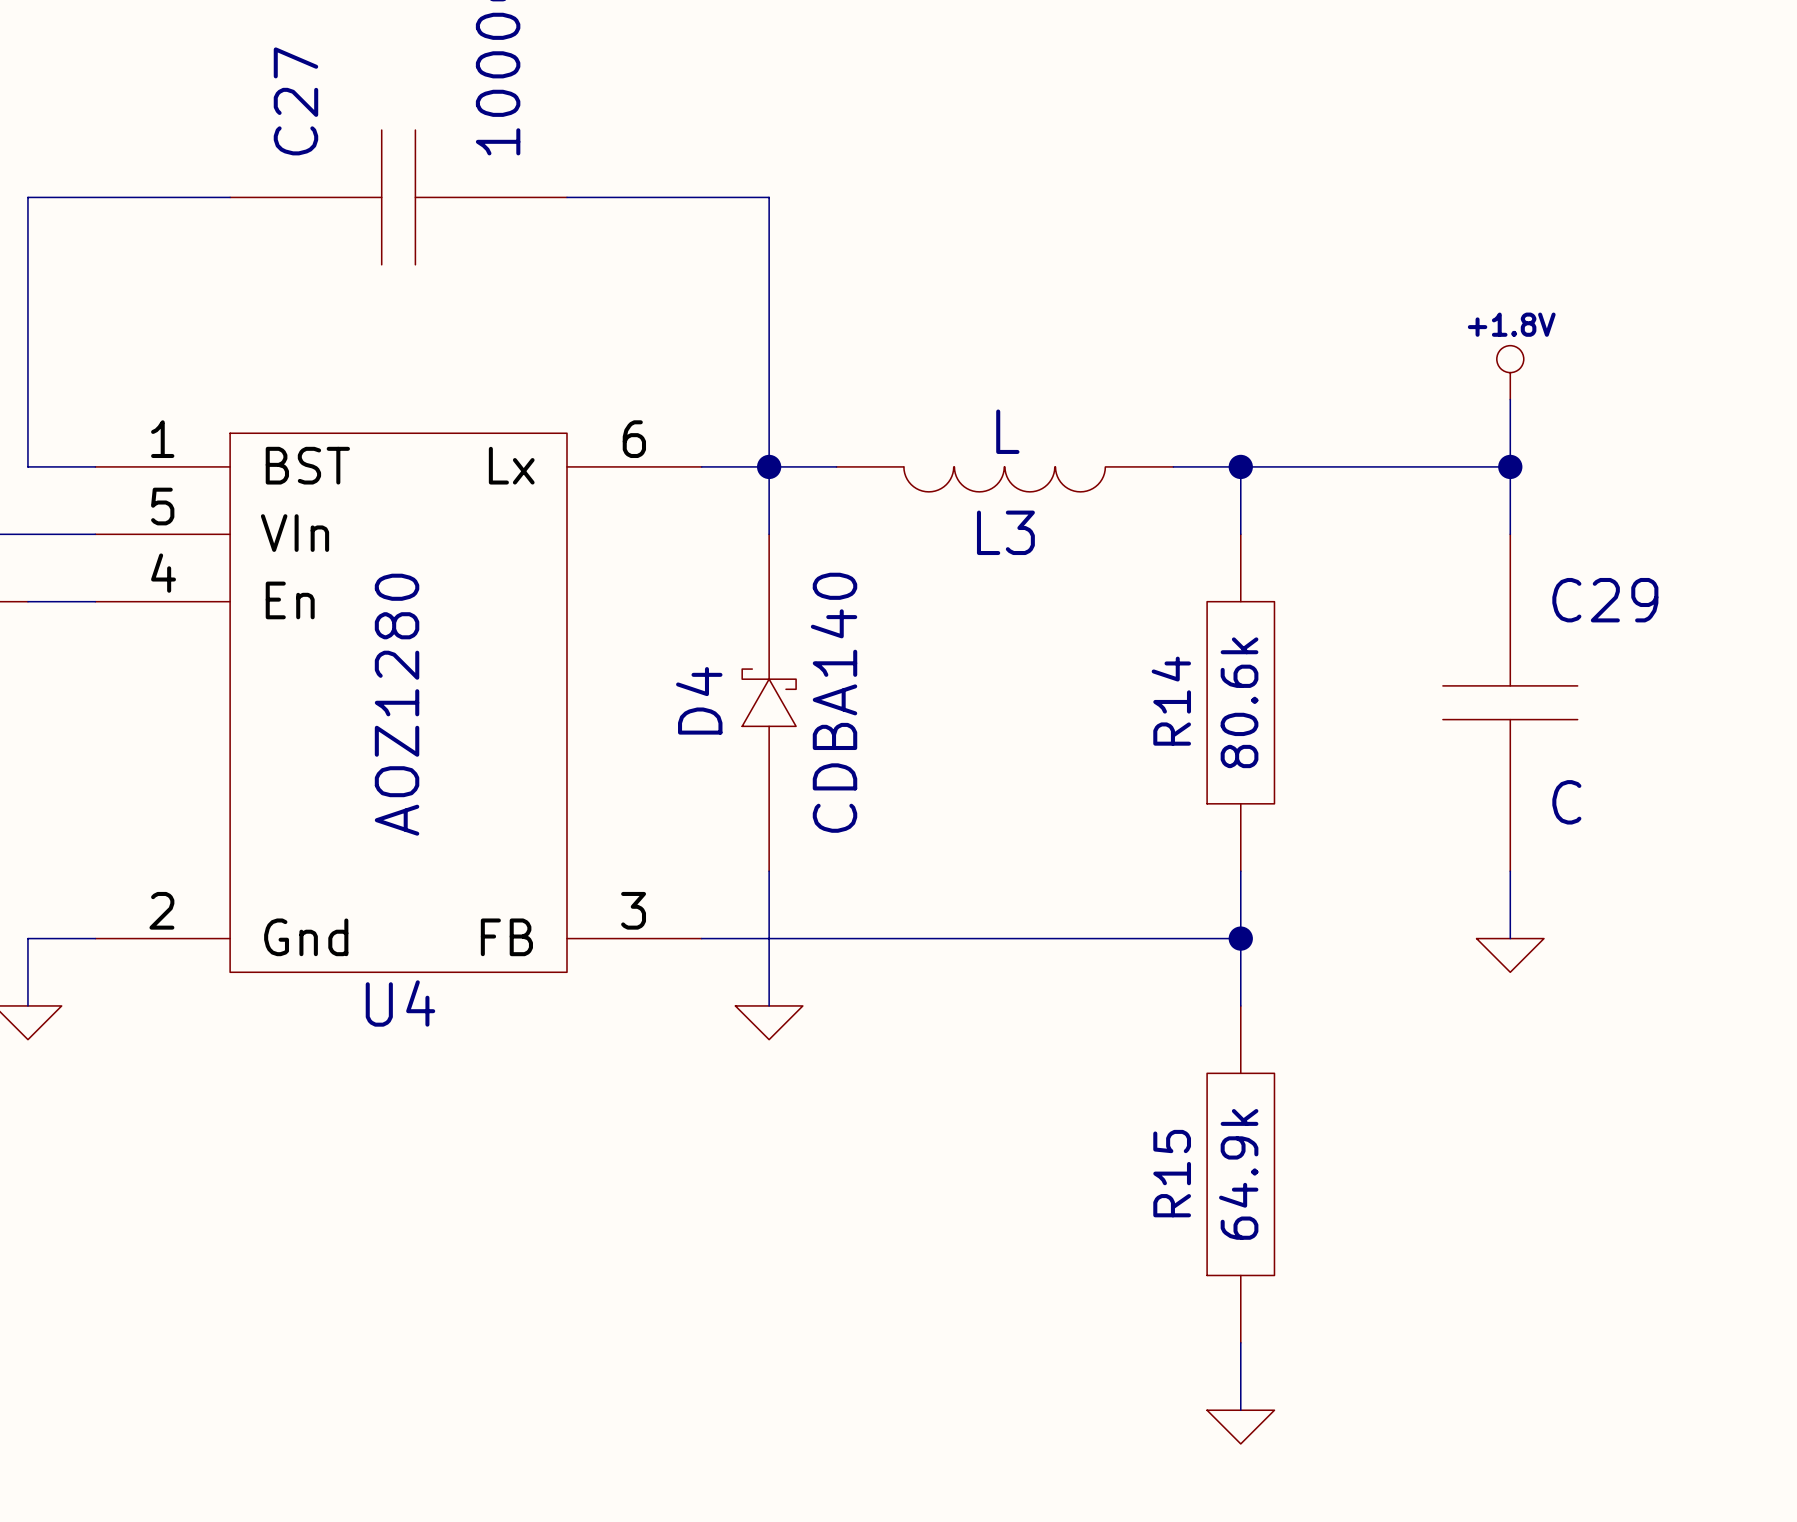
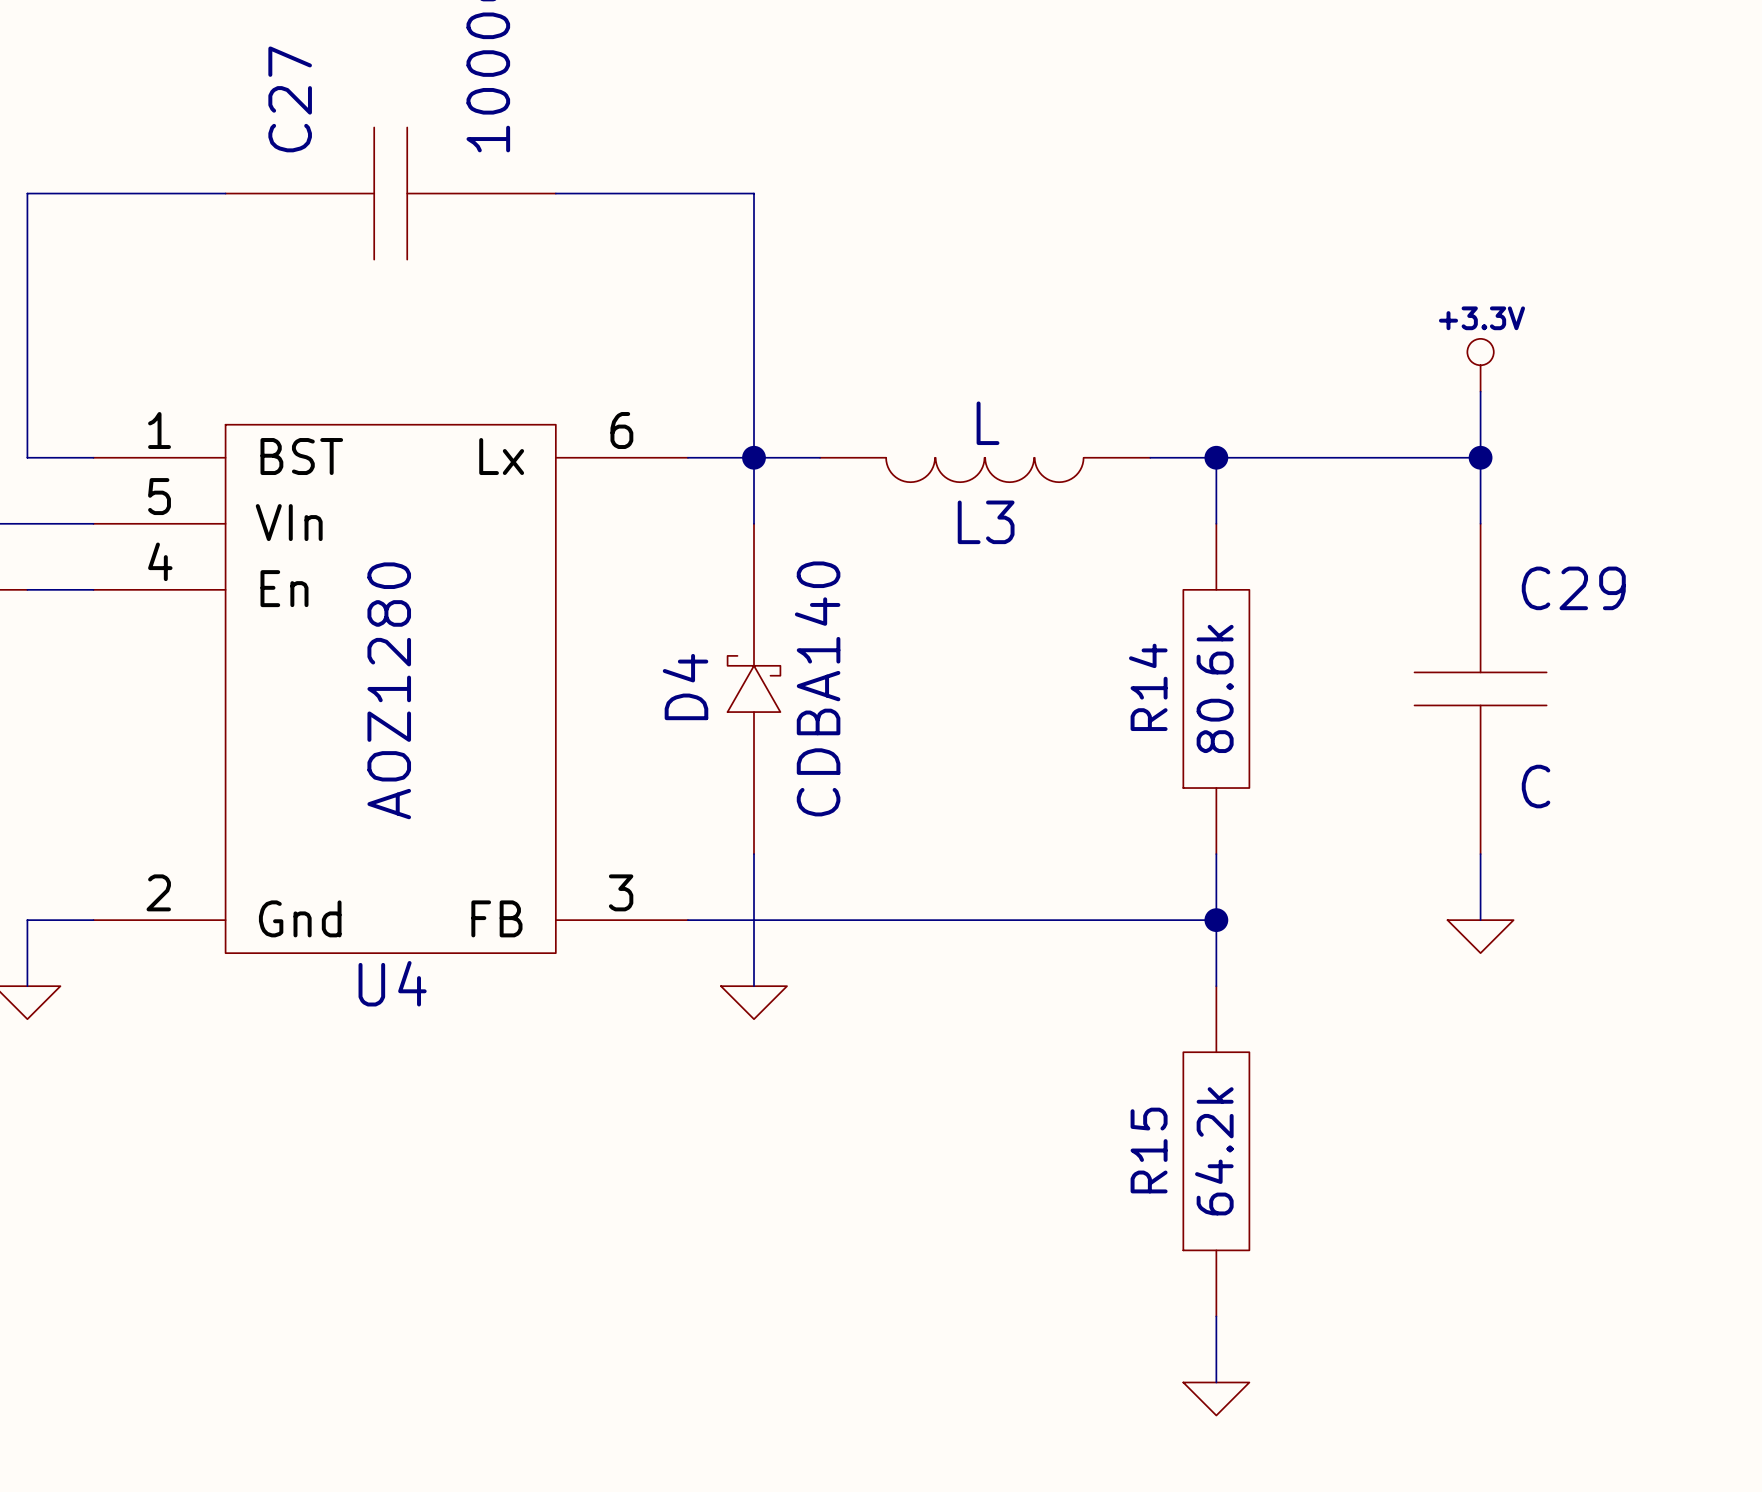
power symbol: +1.8V (1510, 372) -> +3.3V (1480, 365)
R15 value: 64.9k (1238, 1174) -> 64.2k (1214, 1151)

